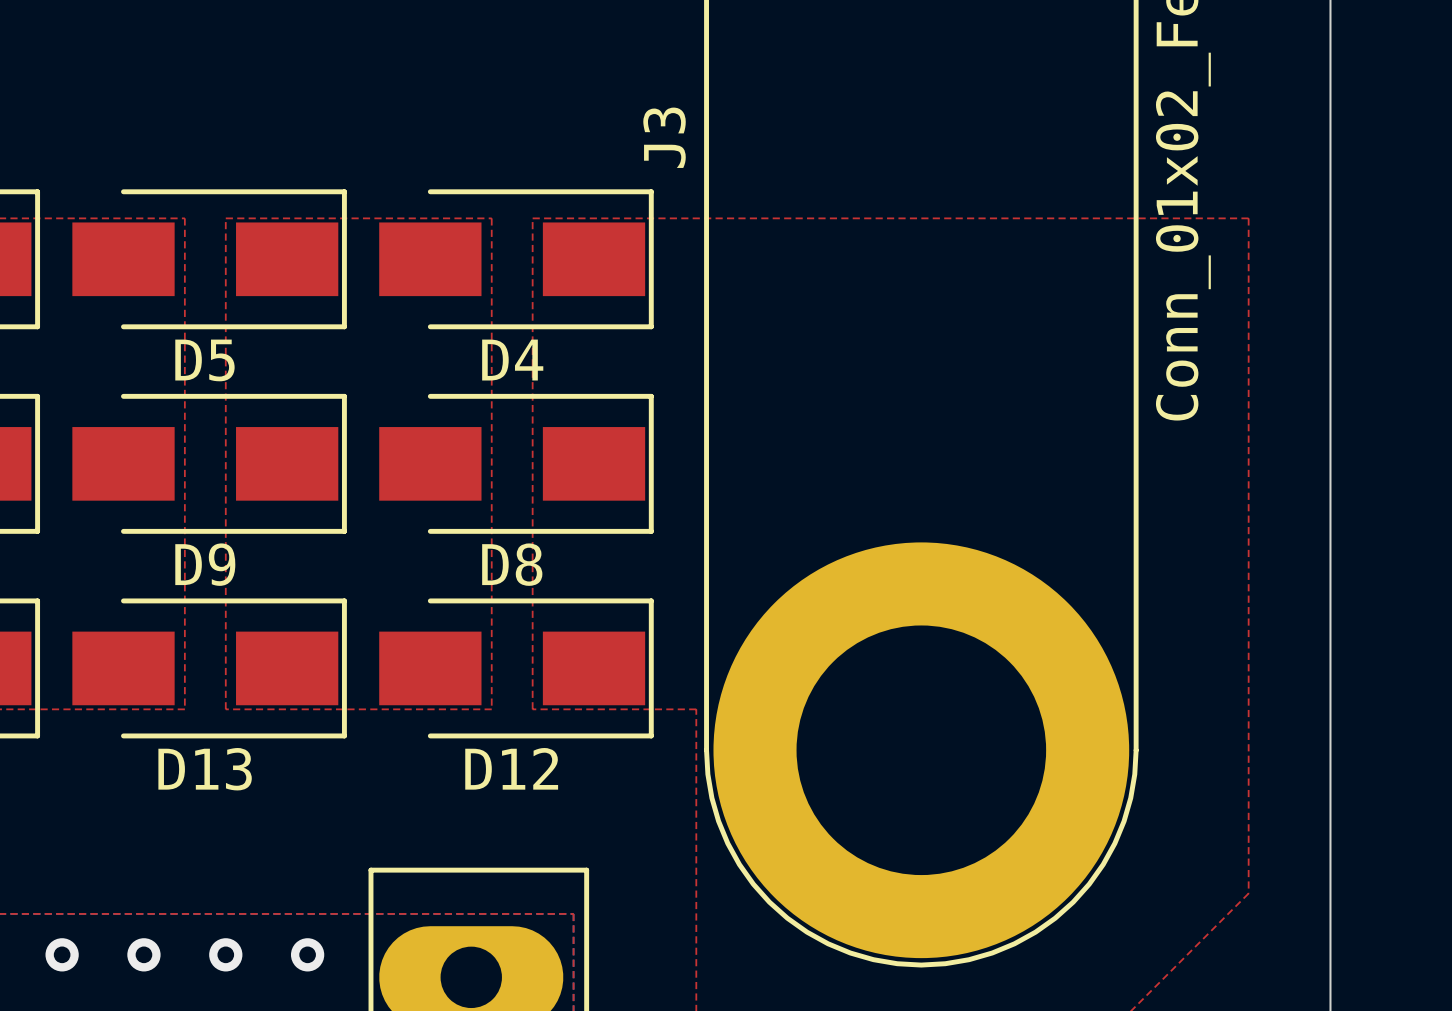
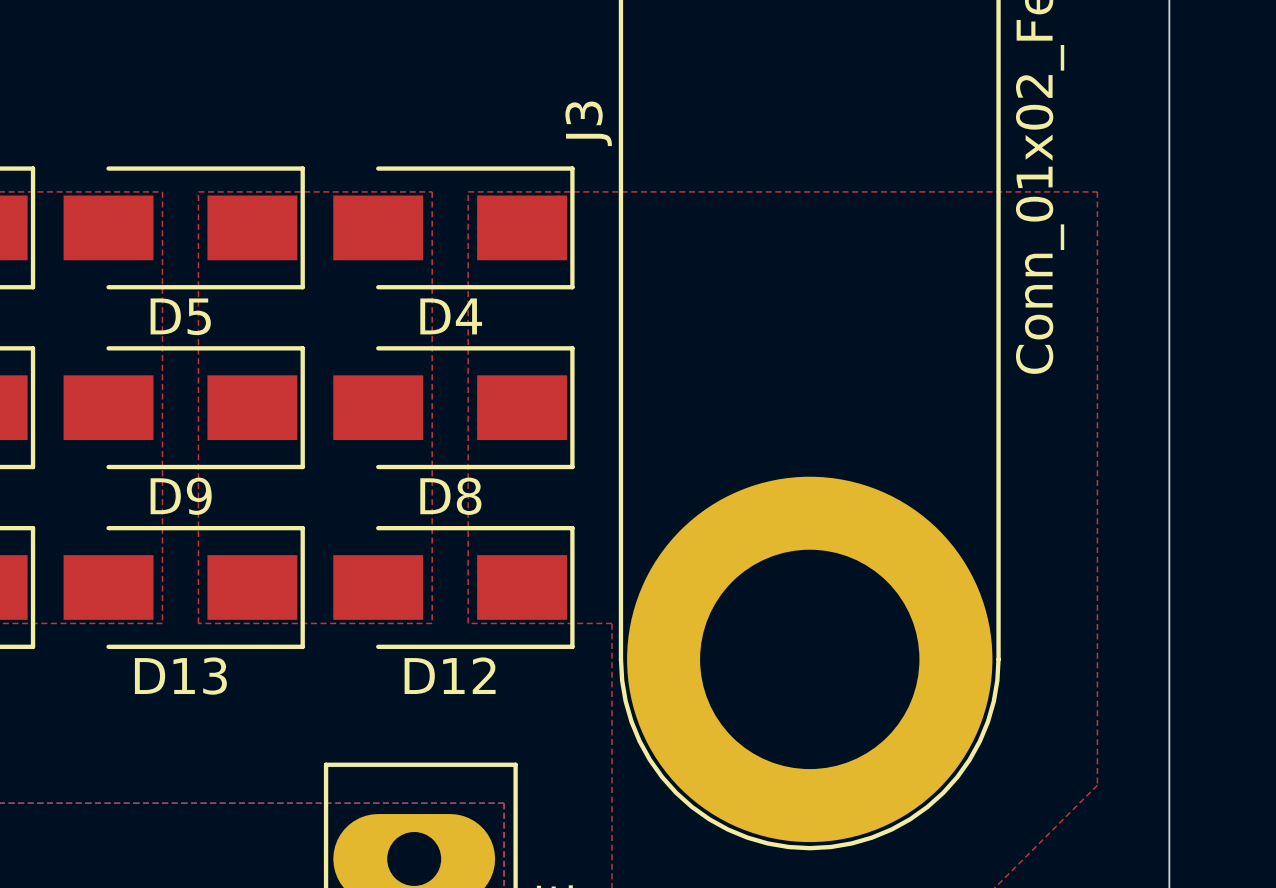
via: (62, 954) -> none
via: (143, 954) -> none
via: (225, 954) -> none
via: (307, 954) -> none

